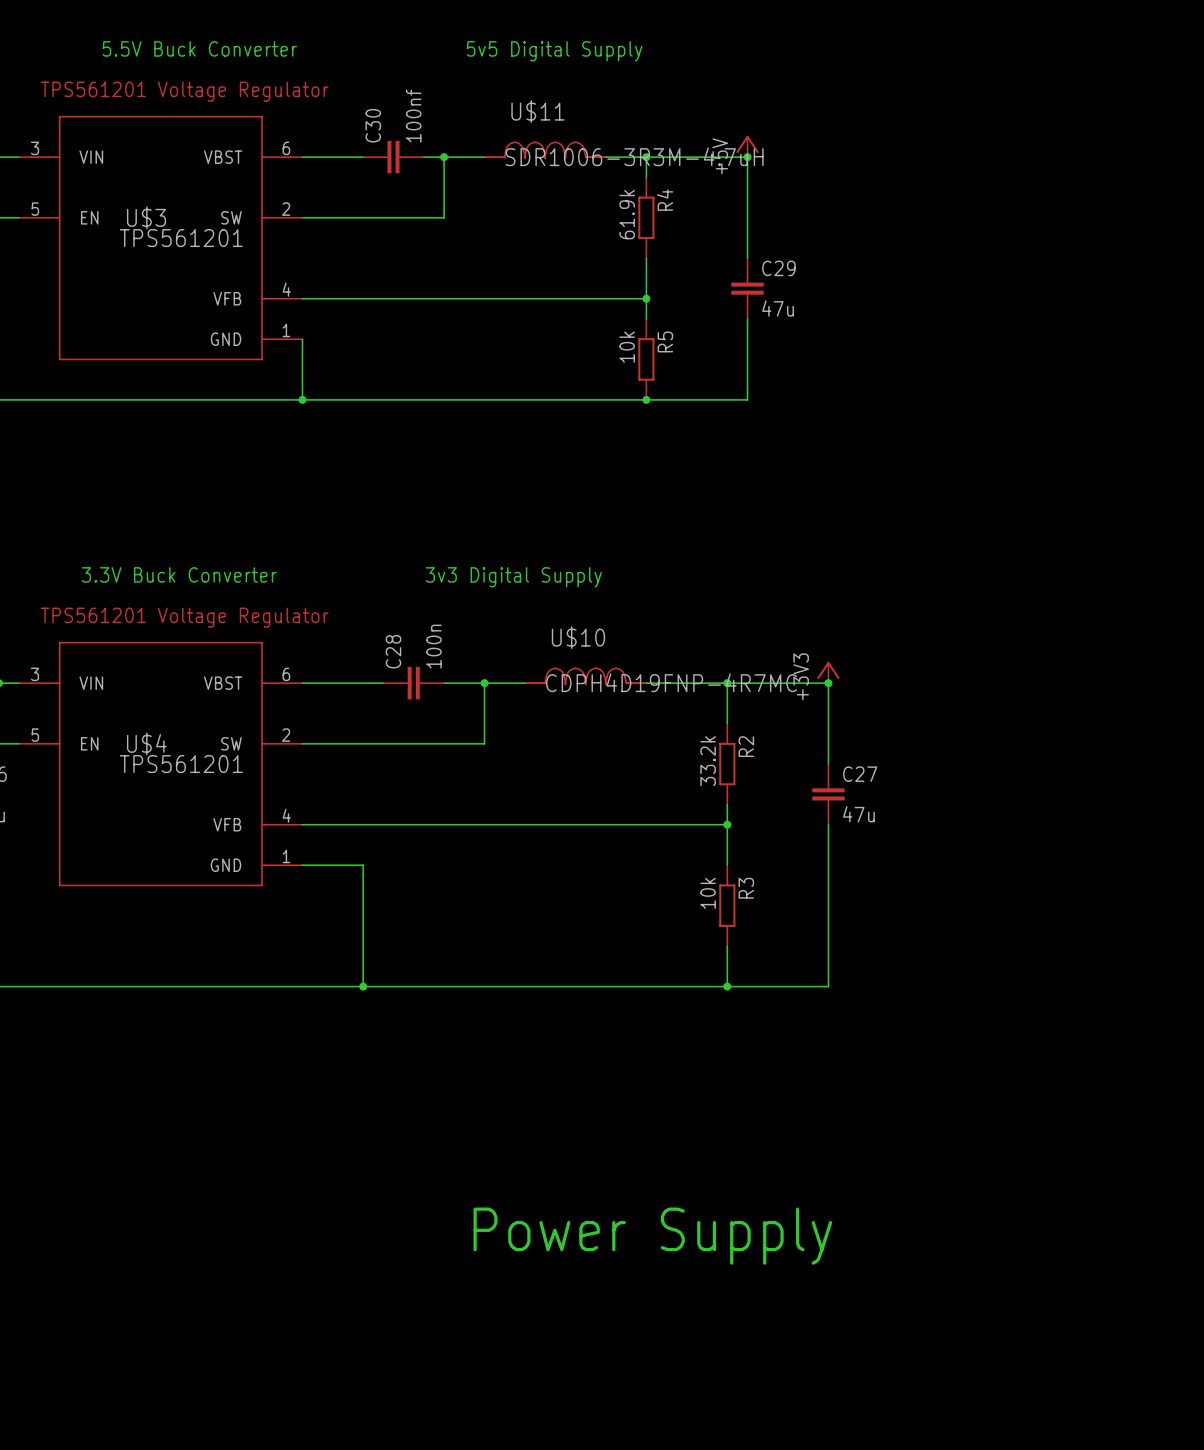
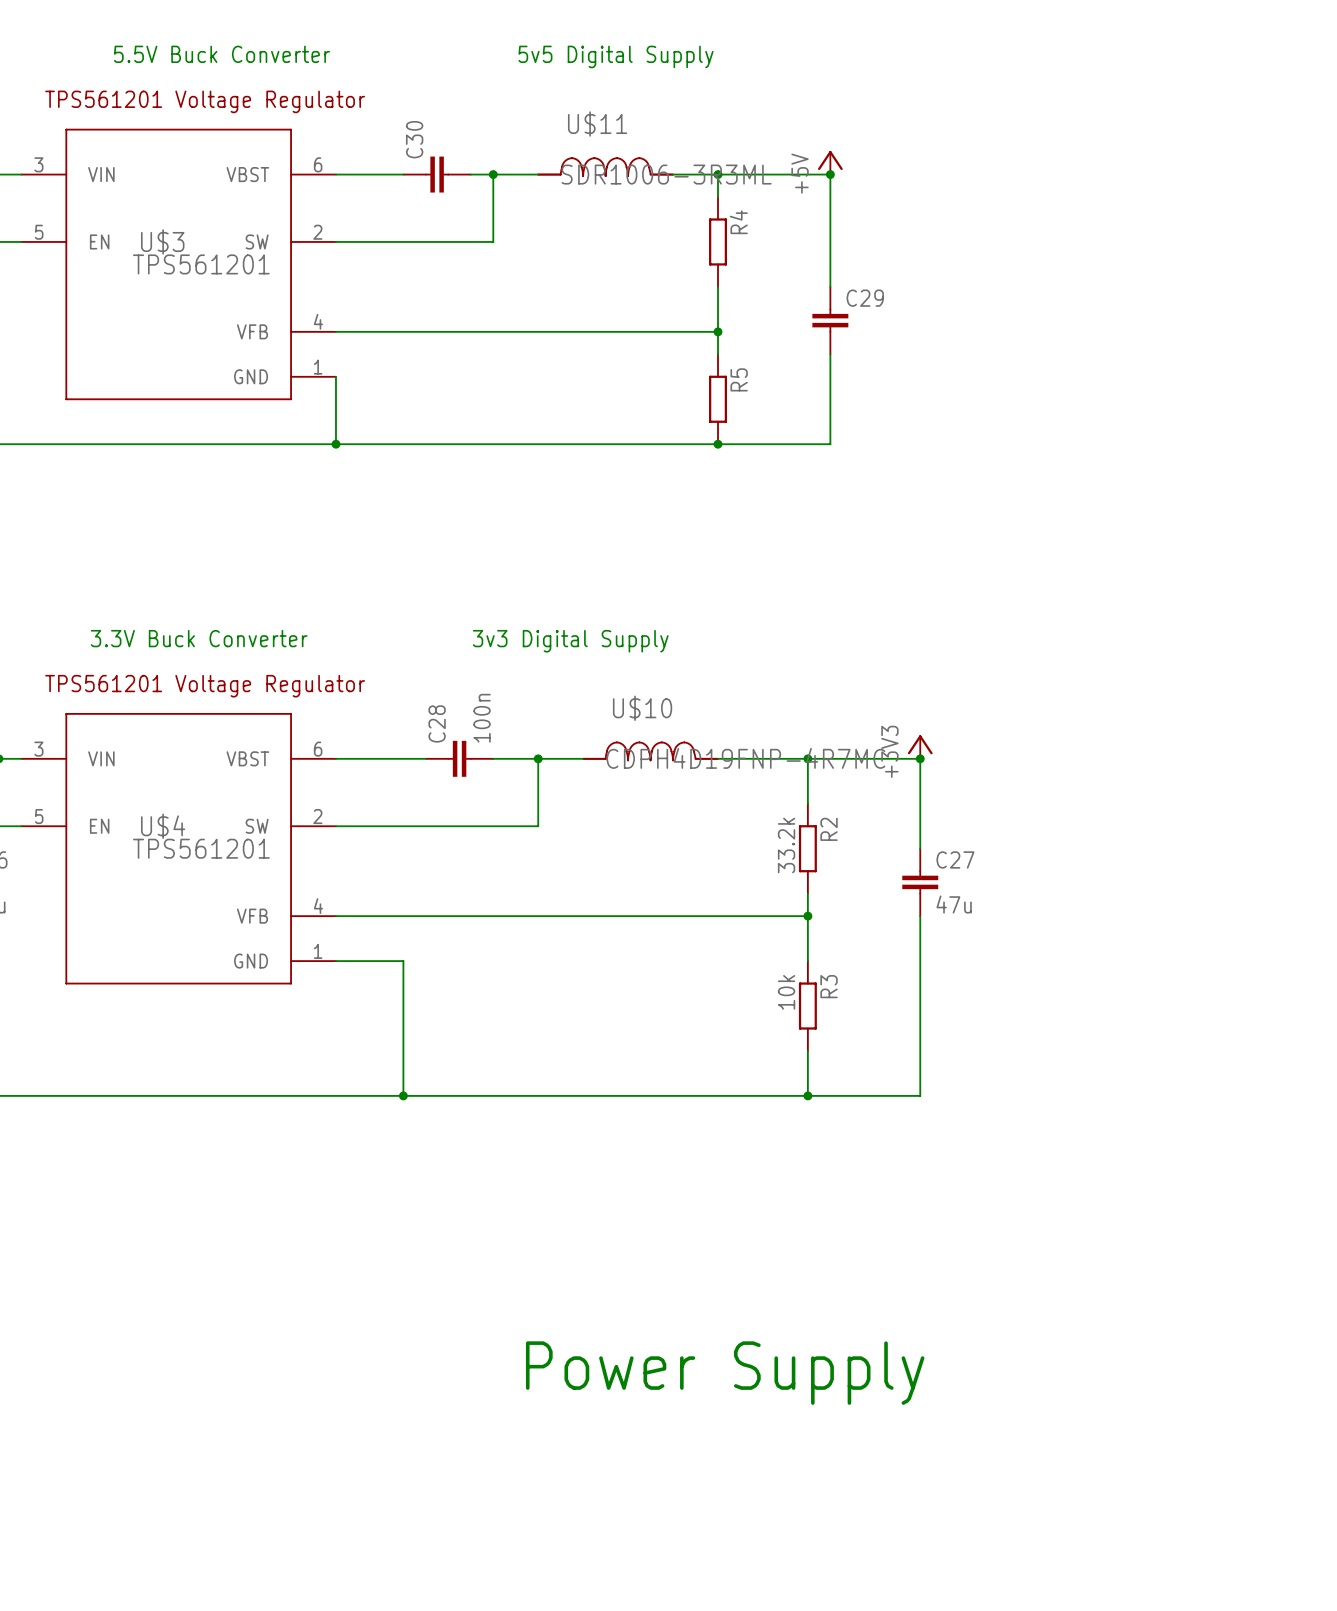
C30 value: 100nf (413, 116) -> none
U$11 value: SDR1006-3R3M-4.7uH (634, 156) -> SDR1006-3R3ML (666, 174)
R4 value: 61.9k (627, 214) -> none
C29 value: 47u (778, 308) -> none
R5 value: 10k (627, 347) -> none

